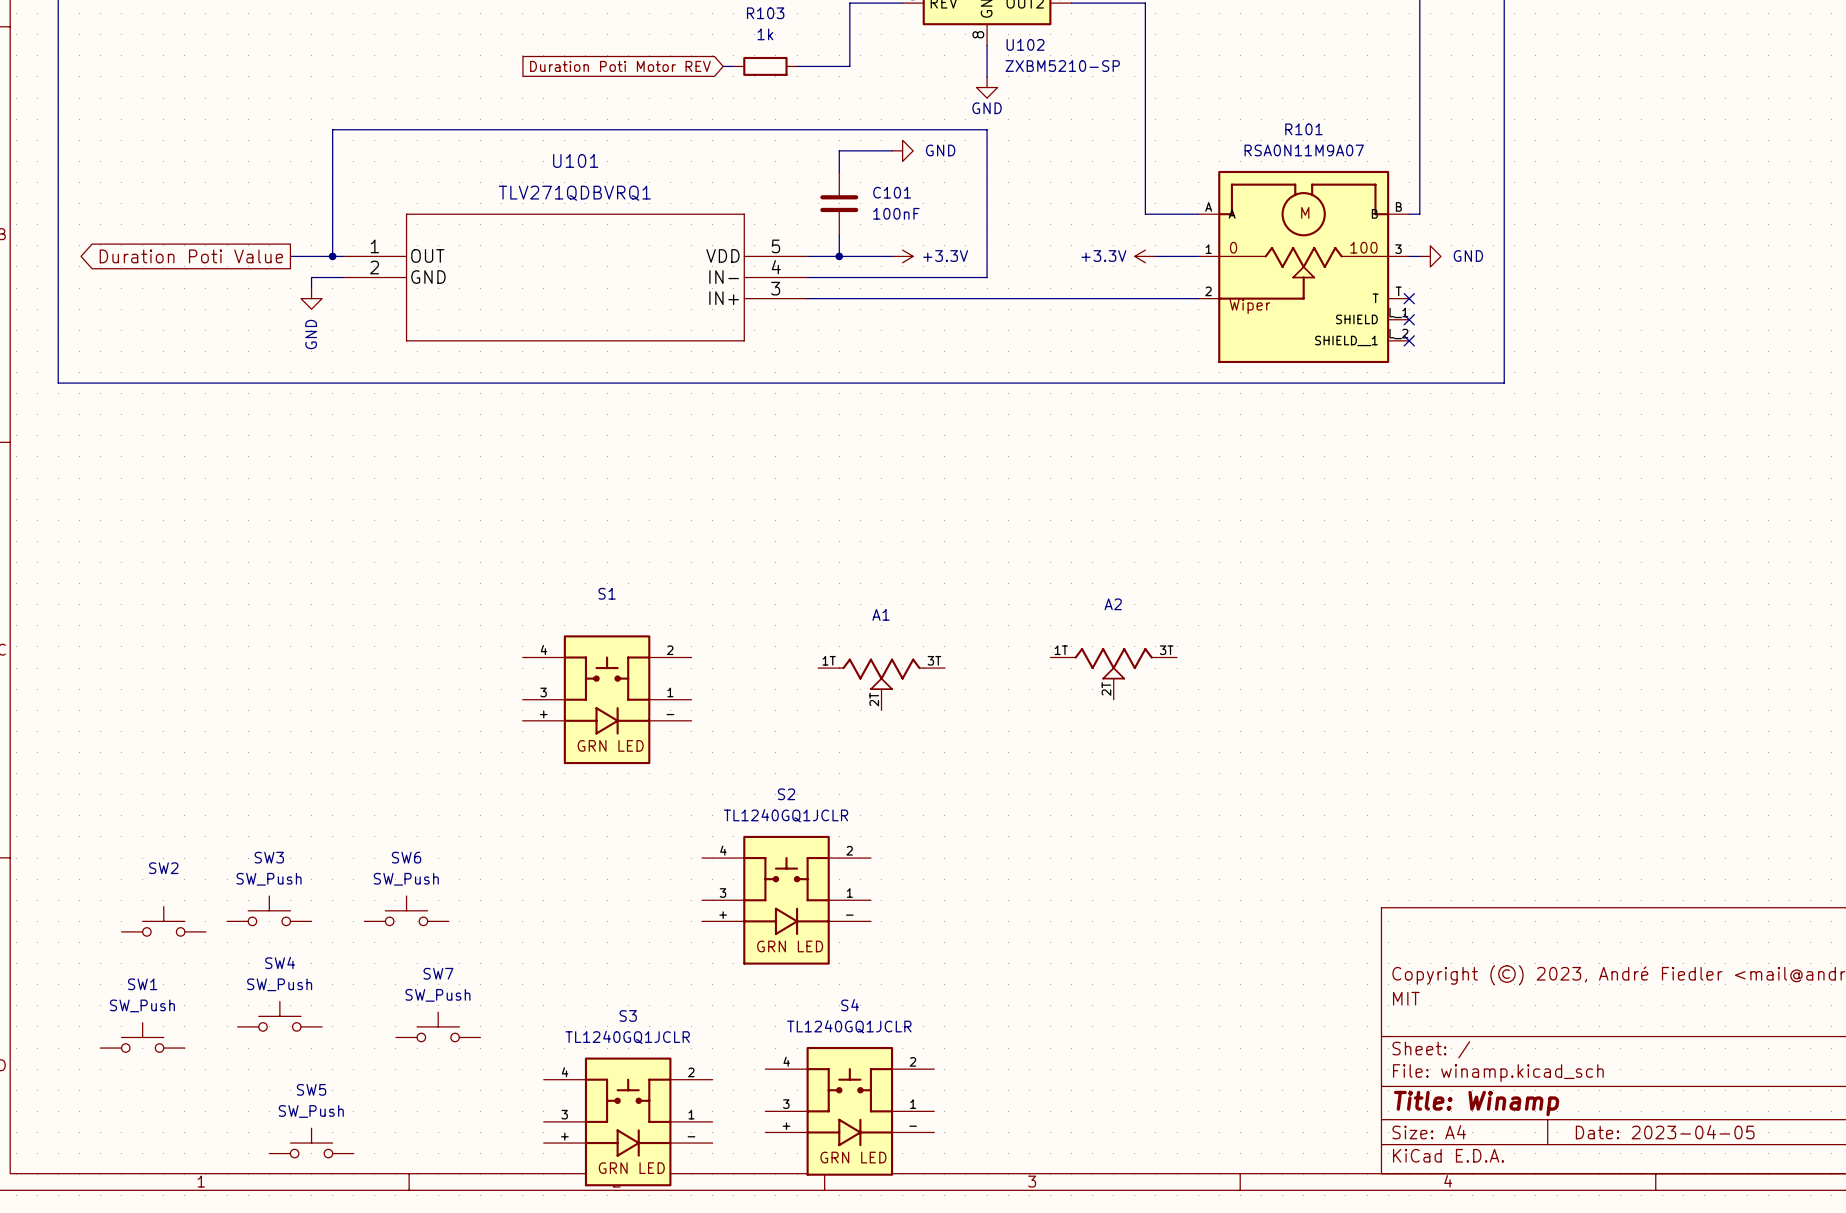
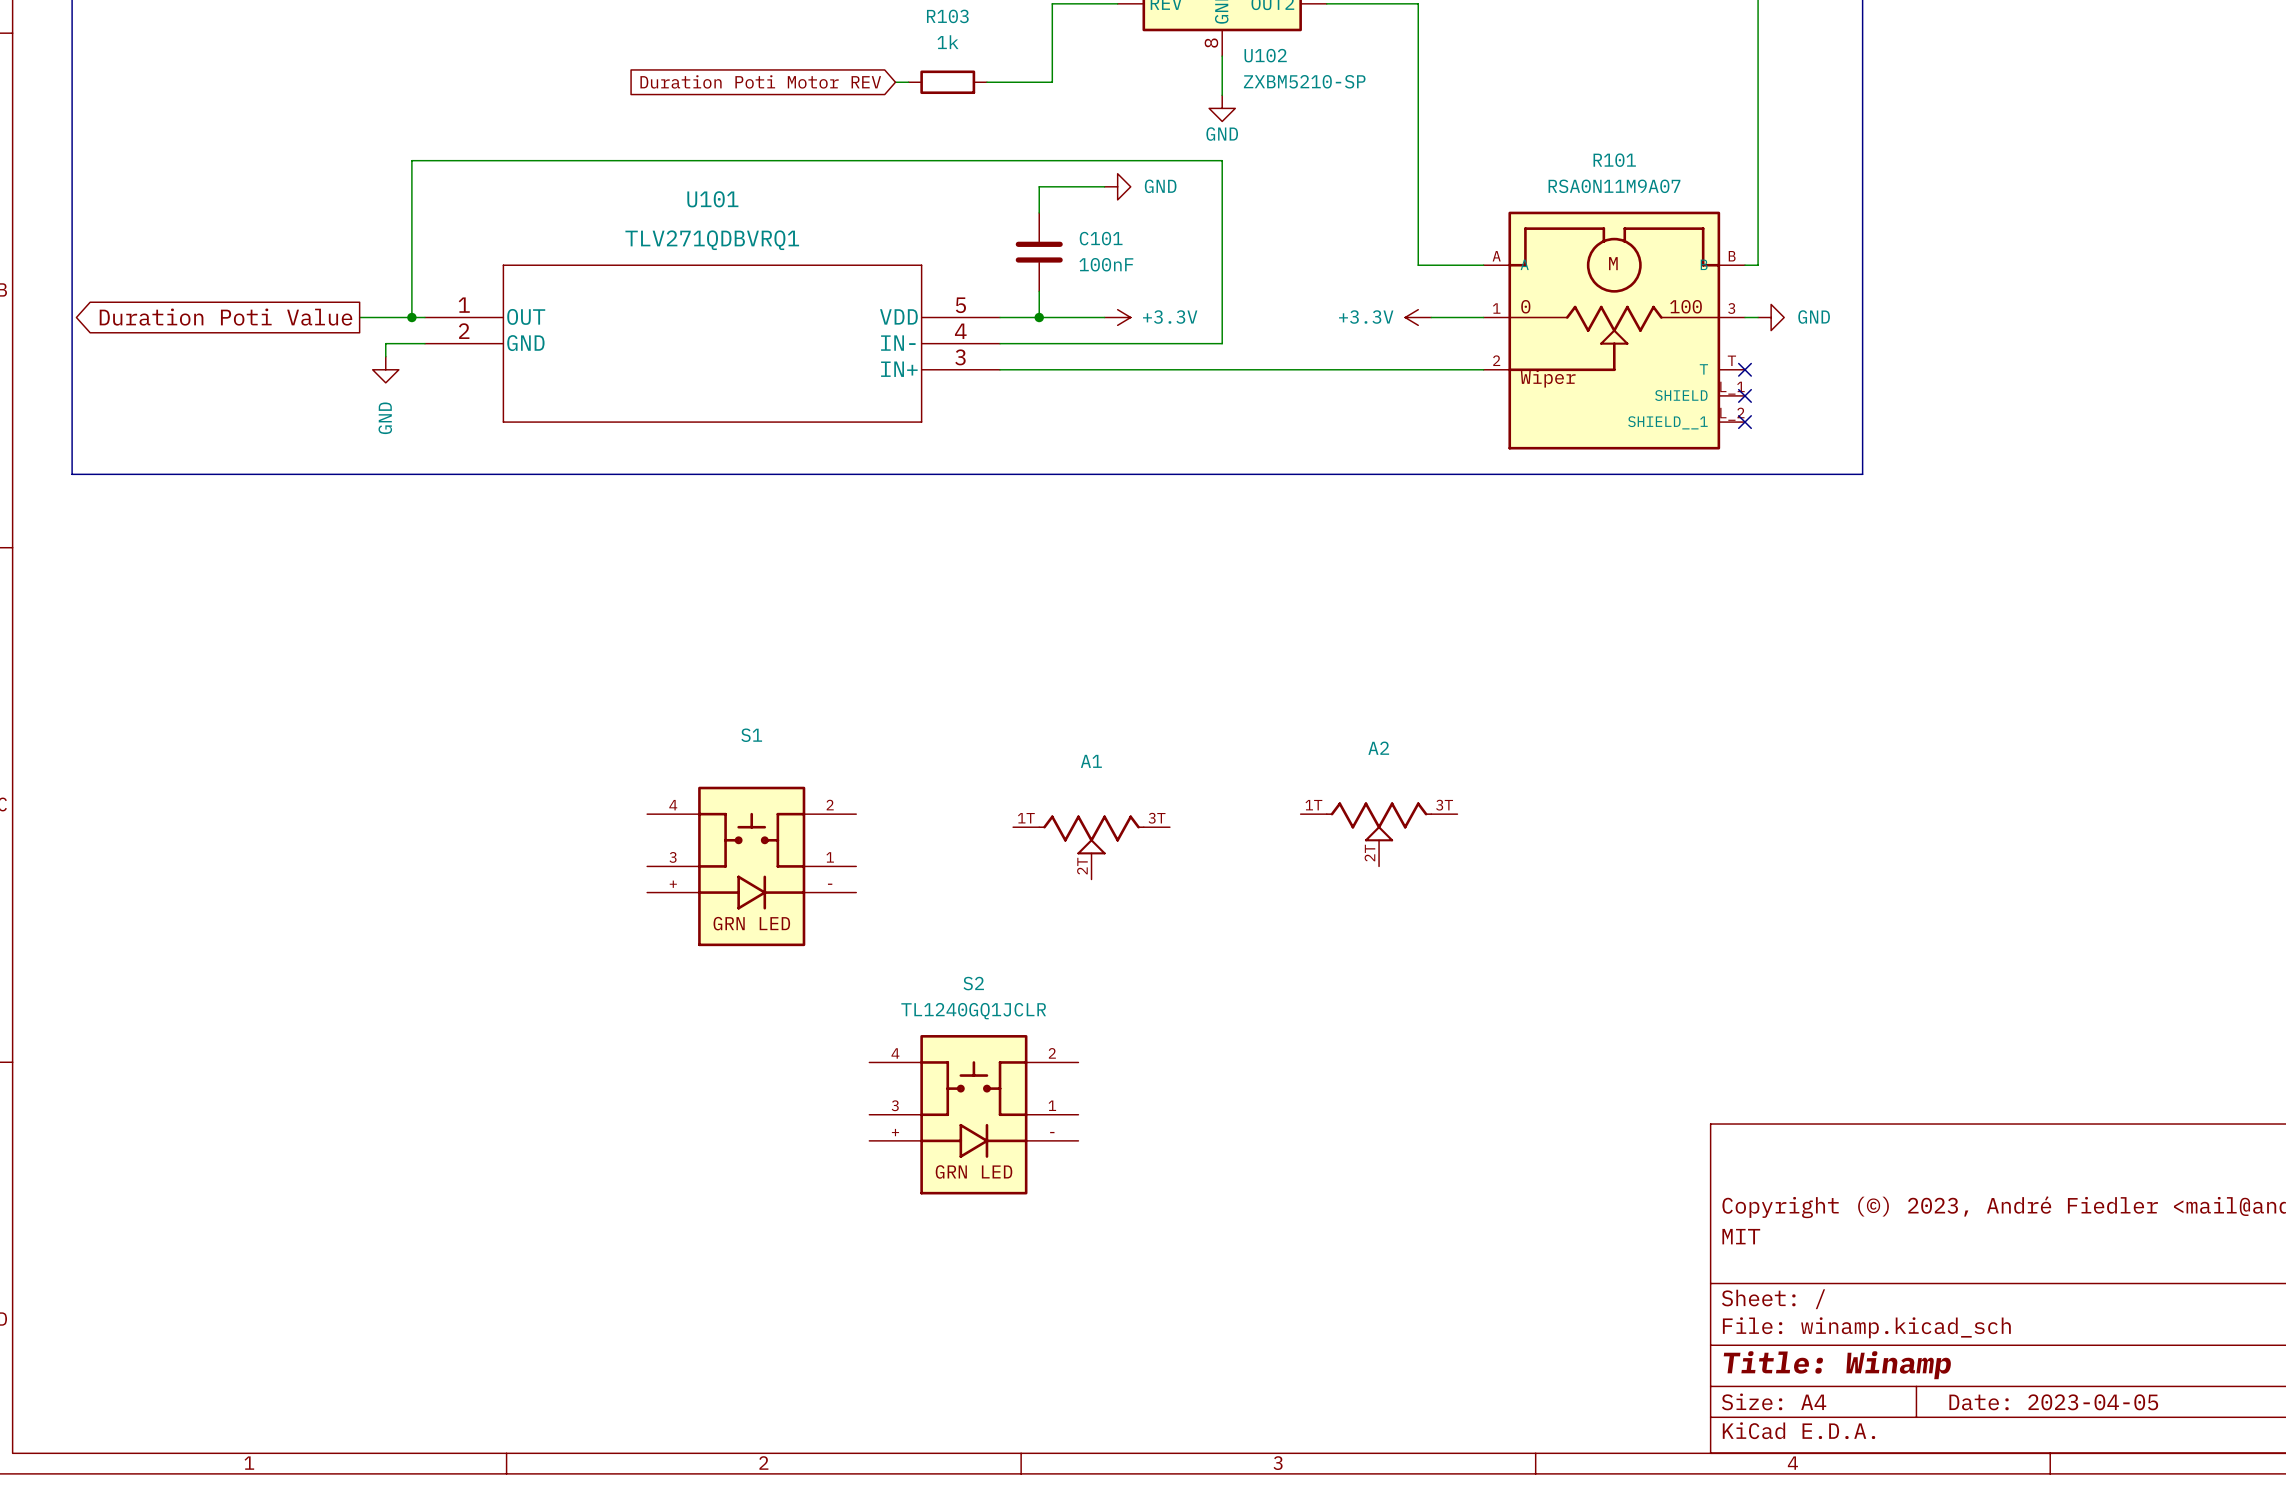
SW3: SW_Push (269, 910) -> none
SW6: SW_Push (406, 910) -> none
SW2: (163, 921) -> none
SW4: SW_Push (279, 1016) -> none
SW7: SW_Push (438, 1026) -> none
SW1: SW_Push (142, 1037) -> none
S4: TL1240GQ1JCLR (849, 1111) -> none
S3: TL1240GQ1JCLR (628, 1121) -> none
SW5: SW_Push (311, 1143) -> none

